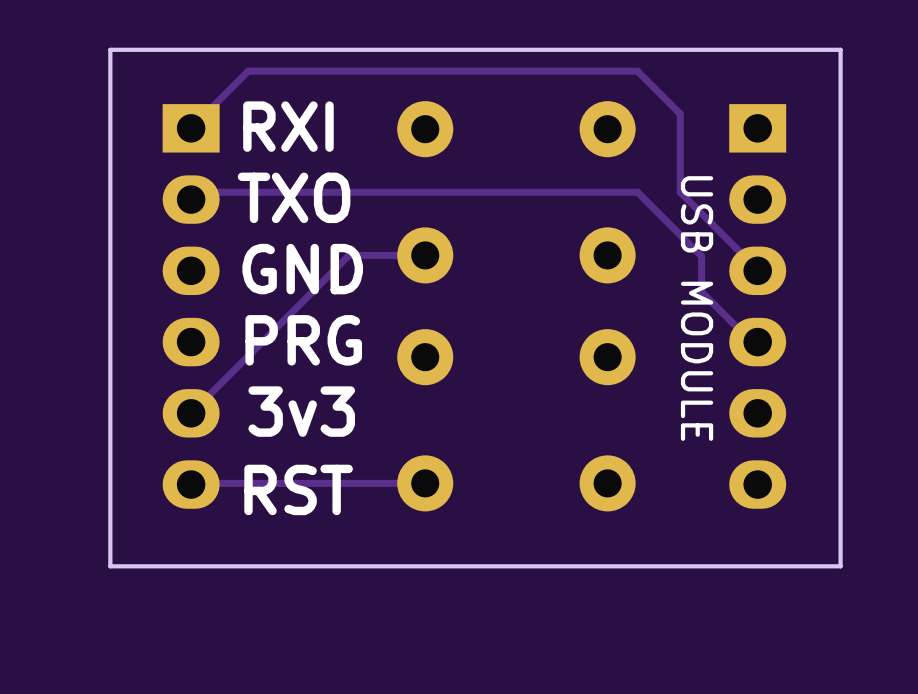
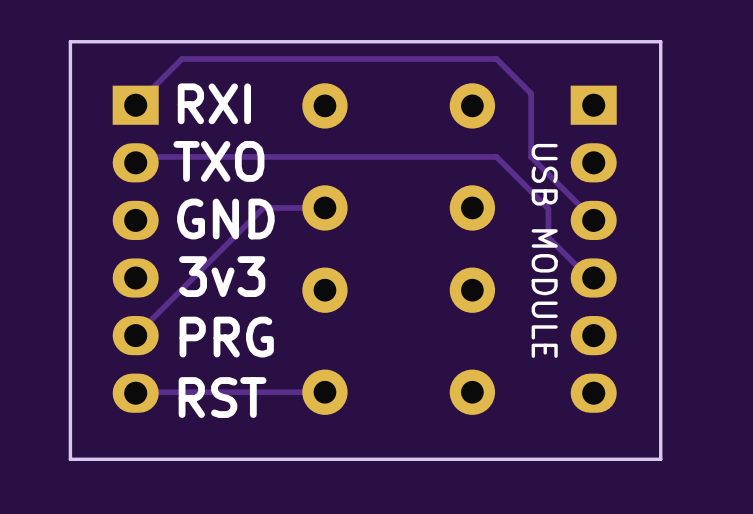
text position: PRG (303, 340) -> PRG (226, 337)
text position: 3v3 (301, 411) -> 3v3 (222, 276)

